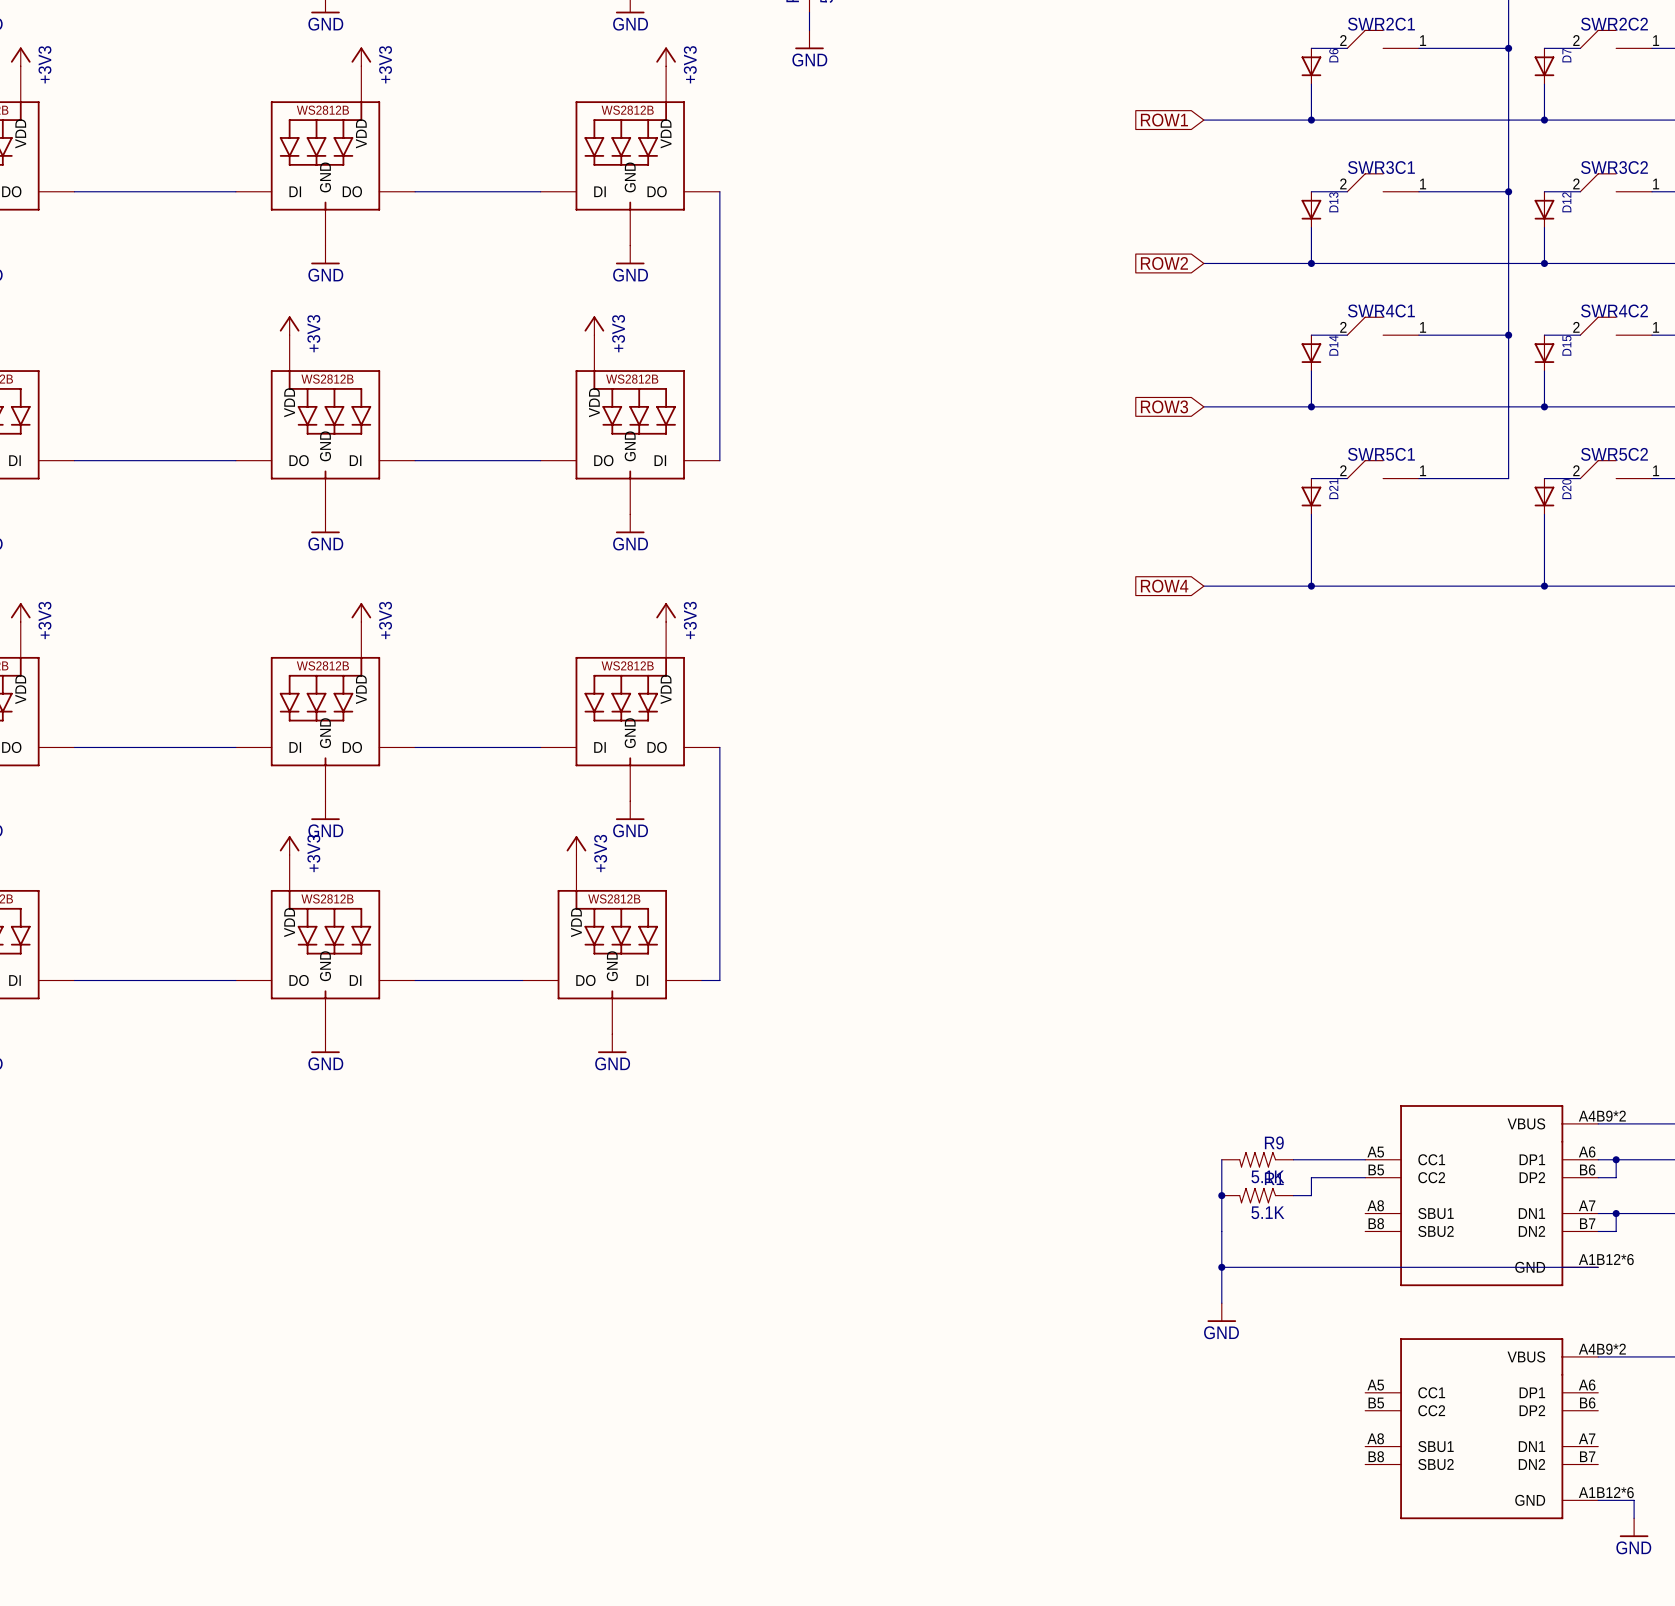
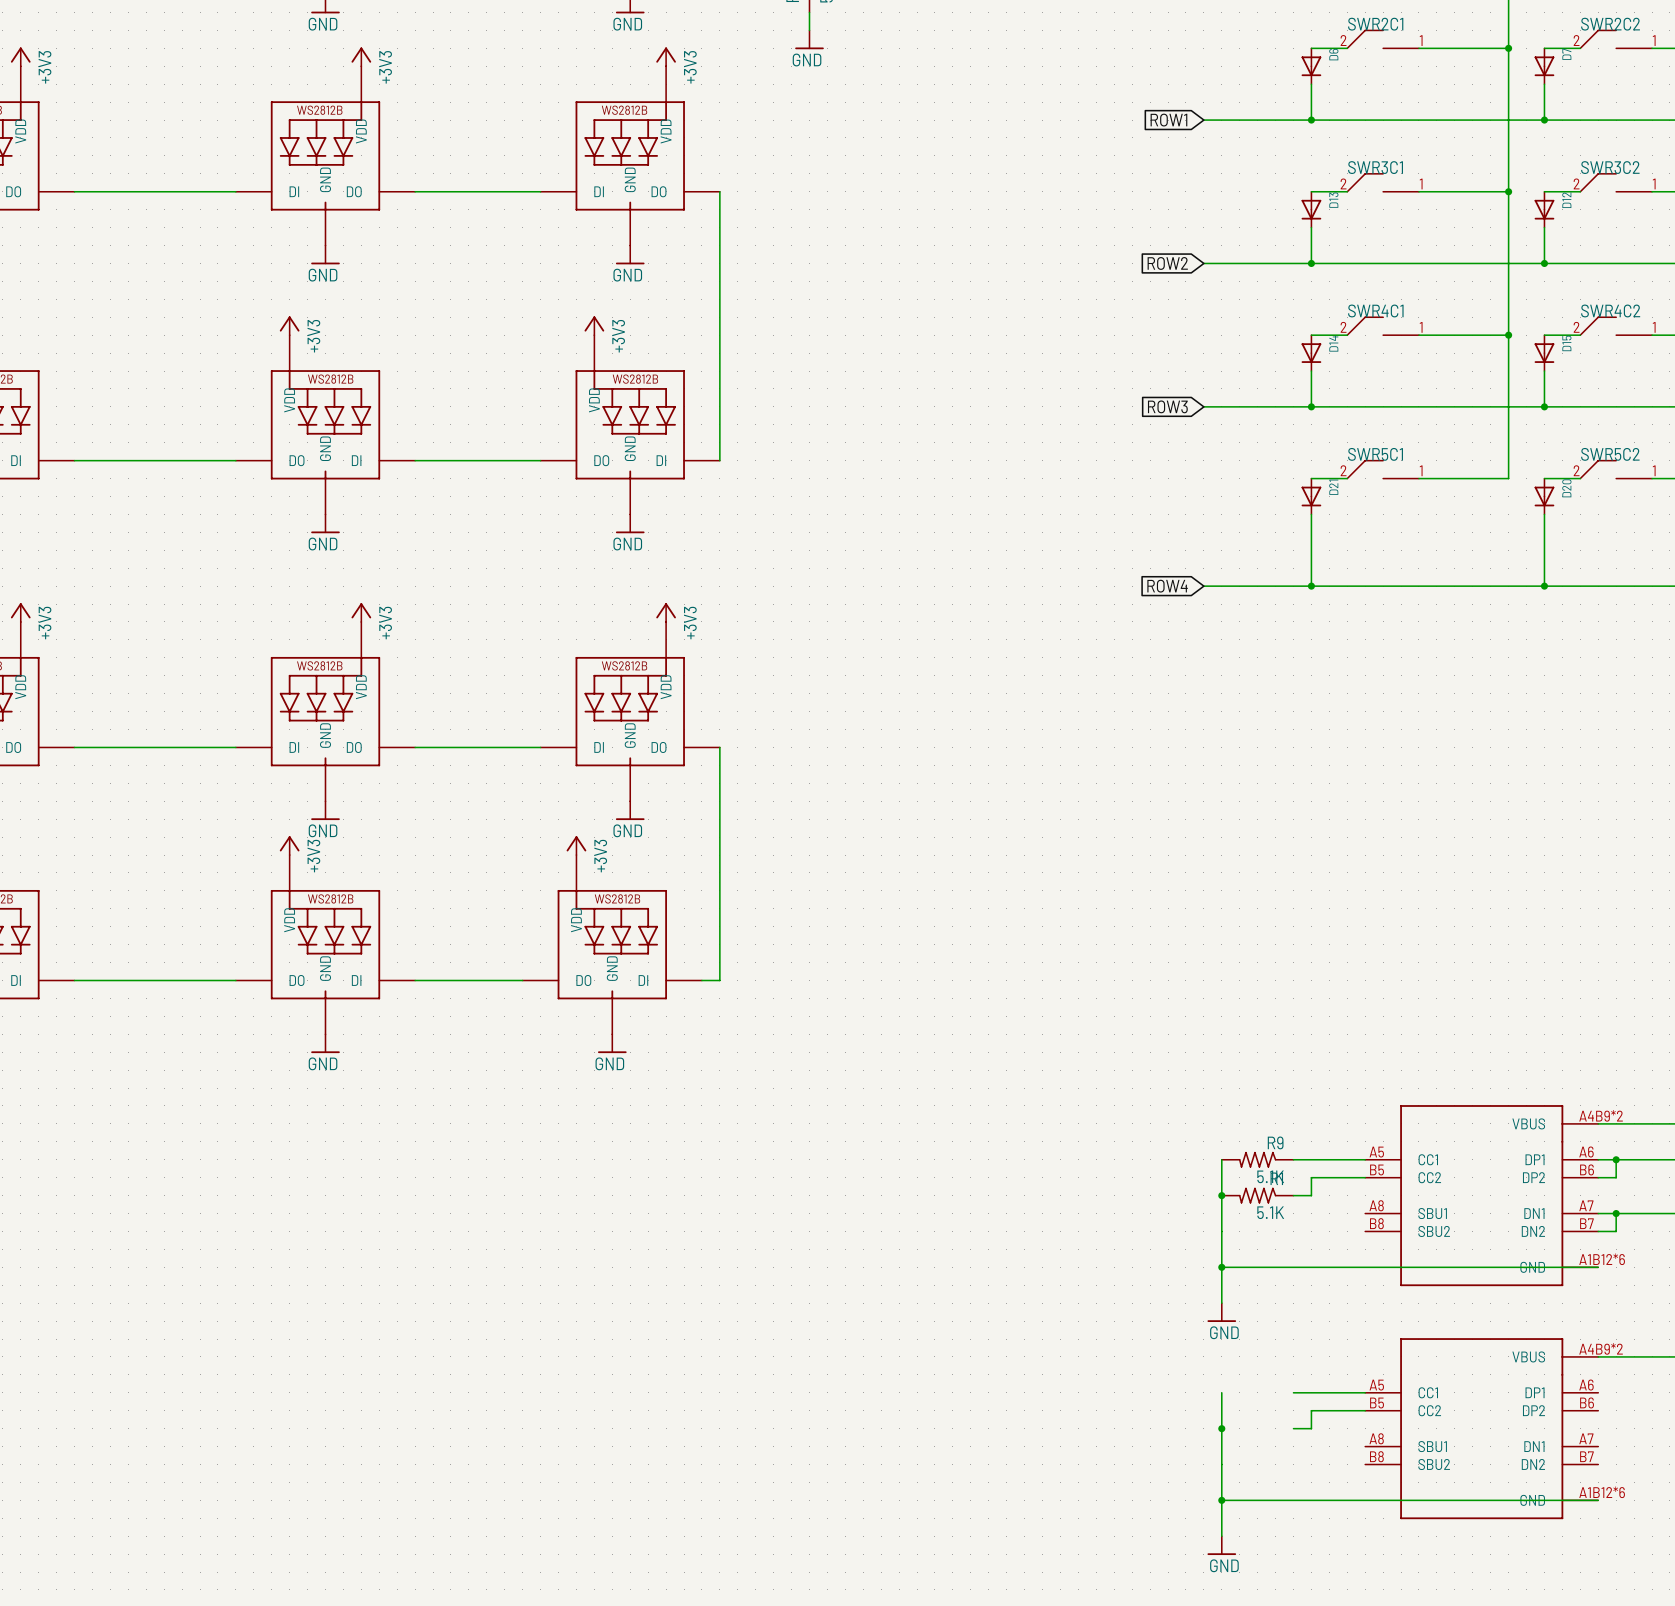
wire: none -> (1221, 1392) (1221, 1536)
wire: none -> (1293, 1392) (1365, 1392)
wire: none -> (1365, 1410) (1311, 1410) (1311, 1428) (1293, 1428)
junction: none -> (1221, 1428)
junction: none -> (1221, 1500)
wire: (1598, 1500) (1634, 1500) (1634, 1518) -> (1598, 1500) (1221, 1500)
power symbol: GND (1634, 1527) -> none
power symbol: none -> GND (1221, 1545)

